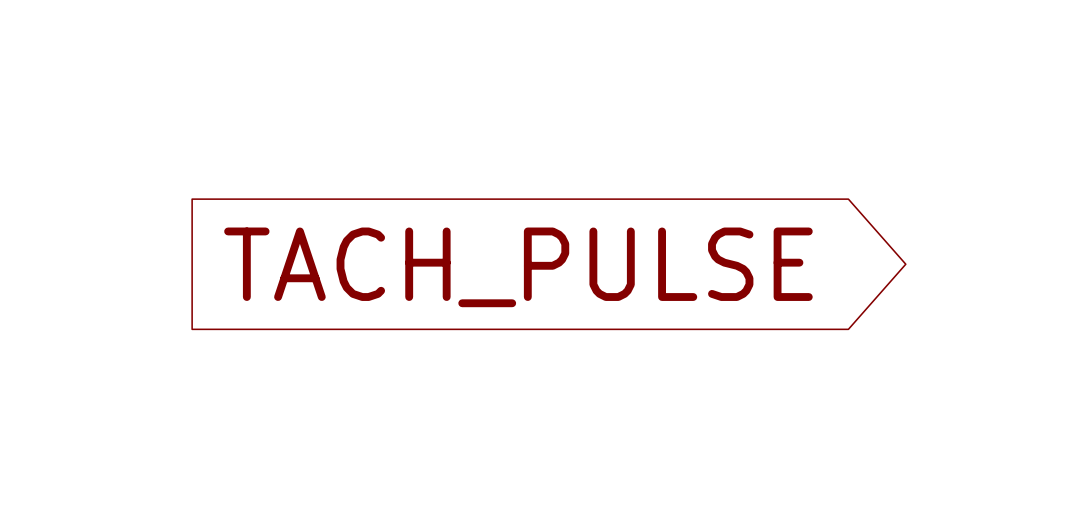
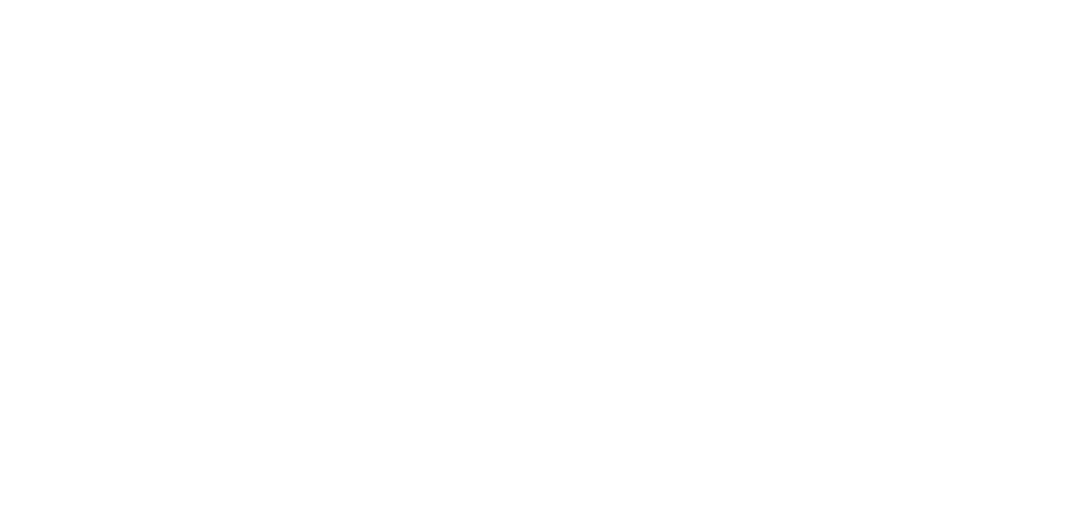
global label: TACH_PULSE (518, 267) -> none

